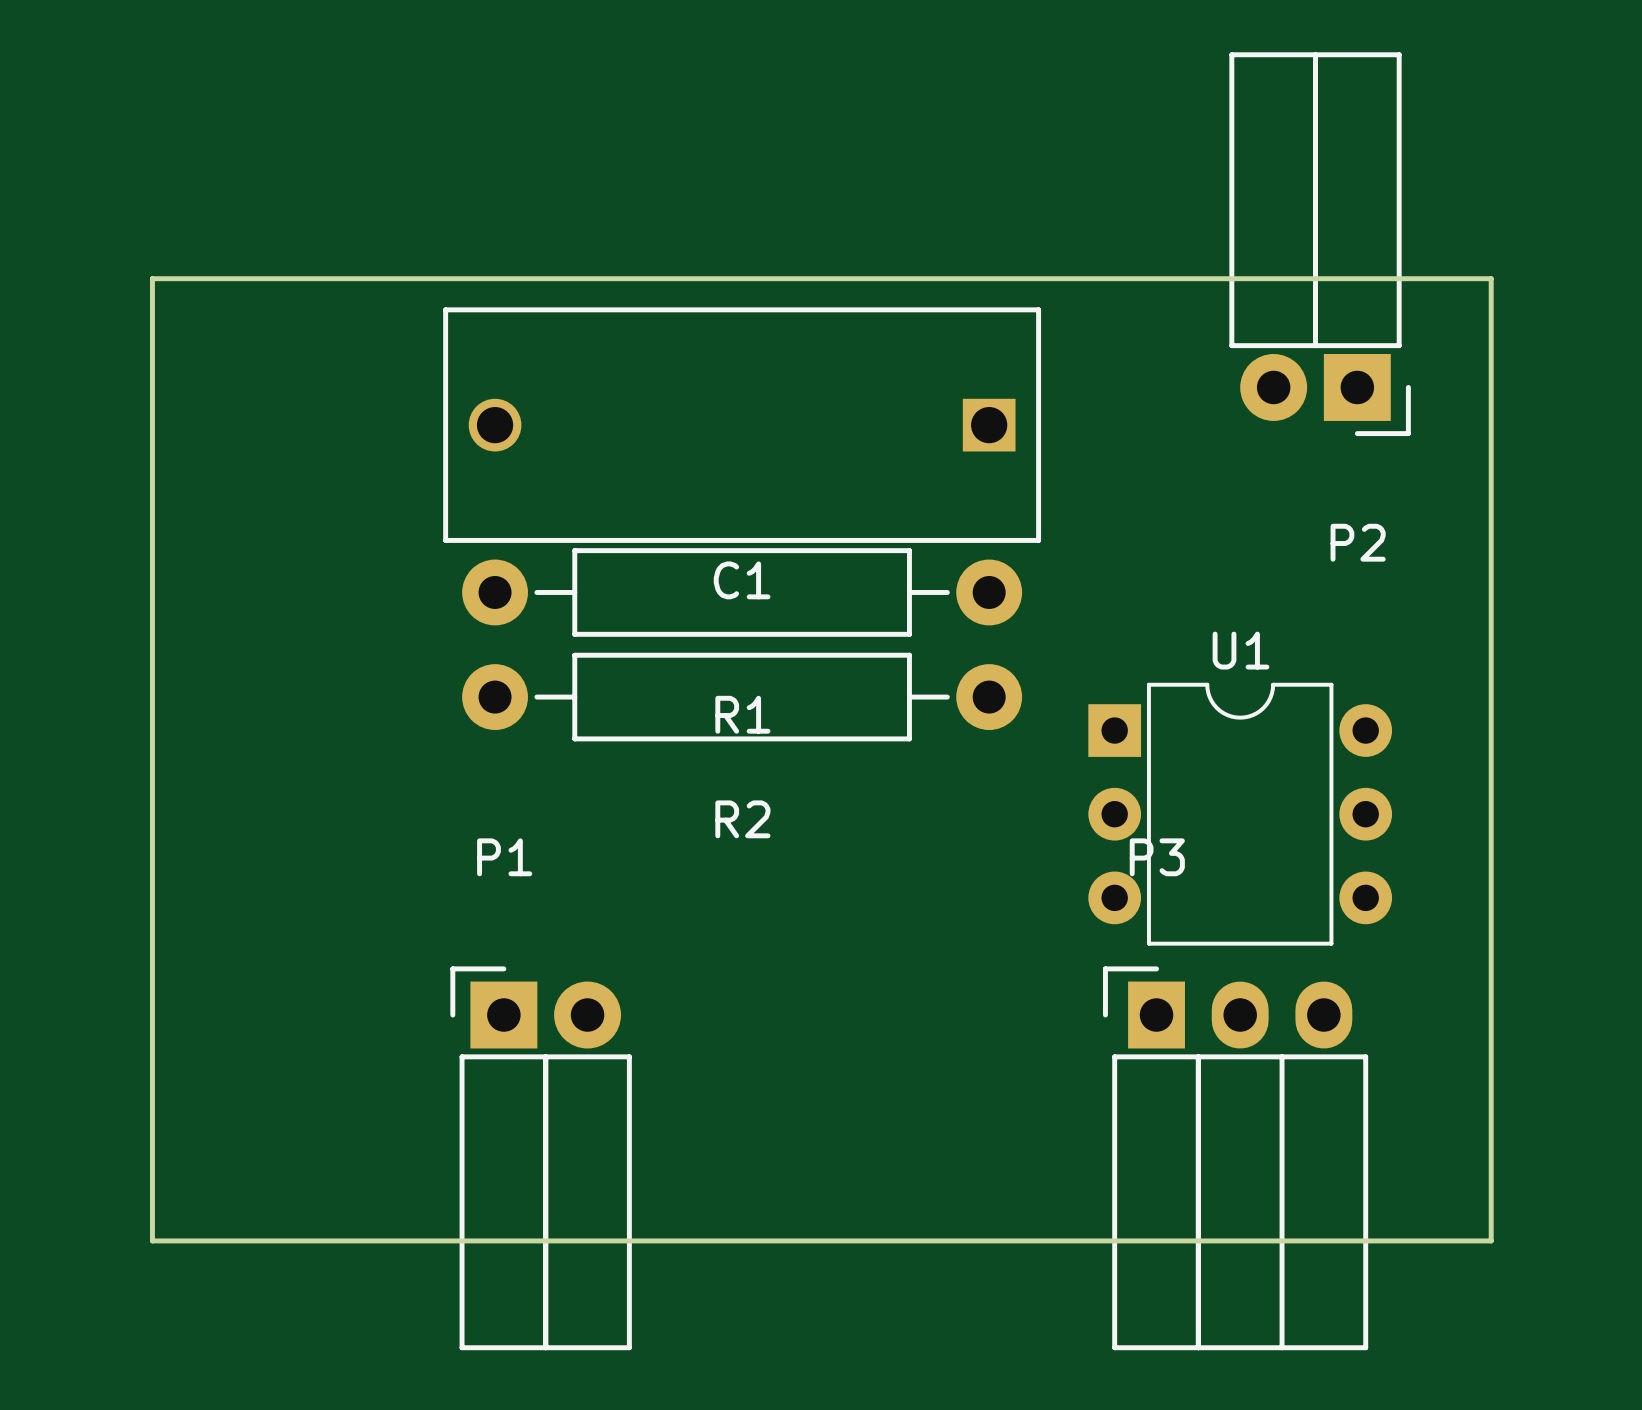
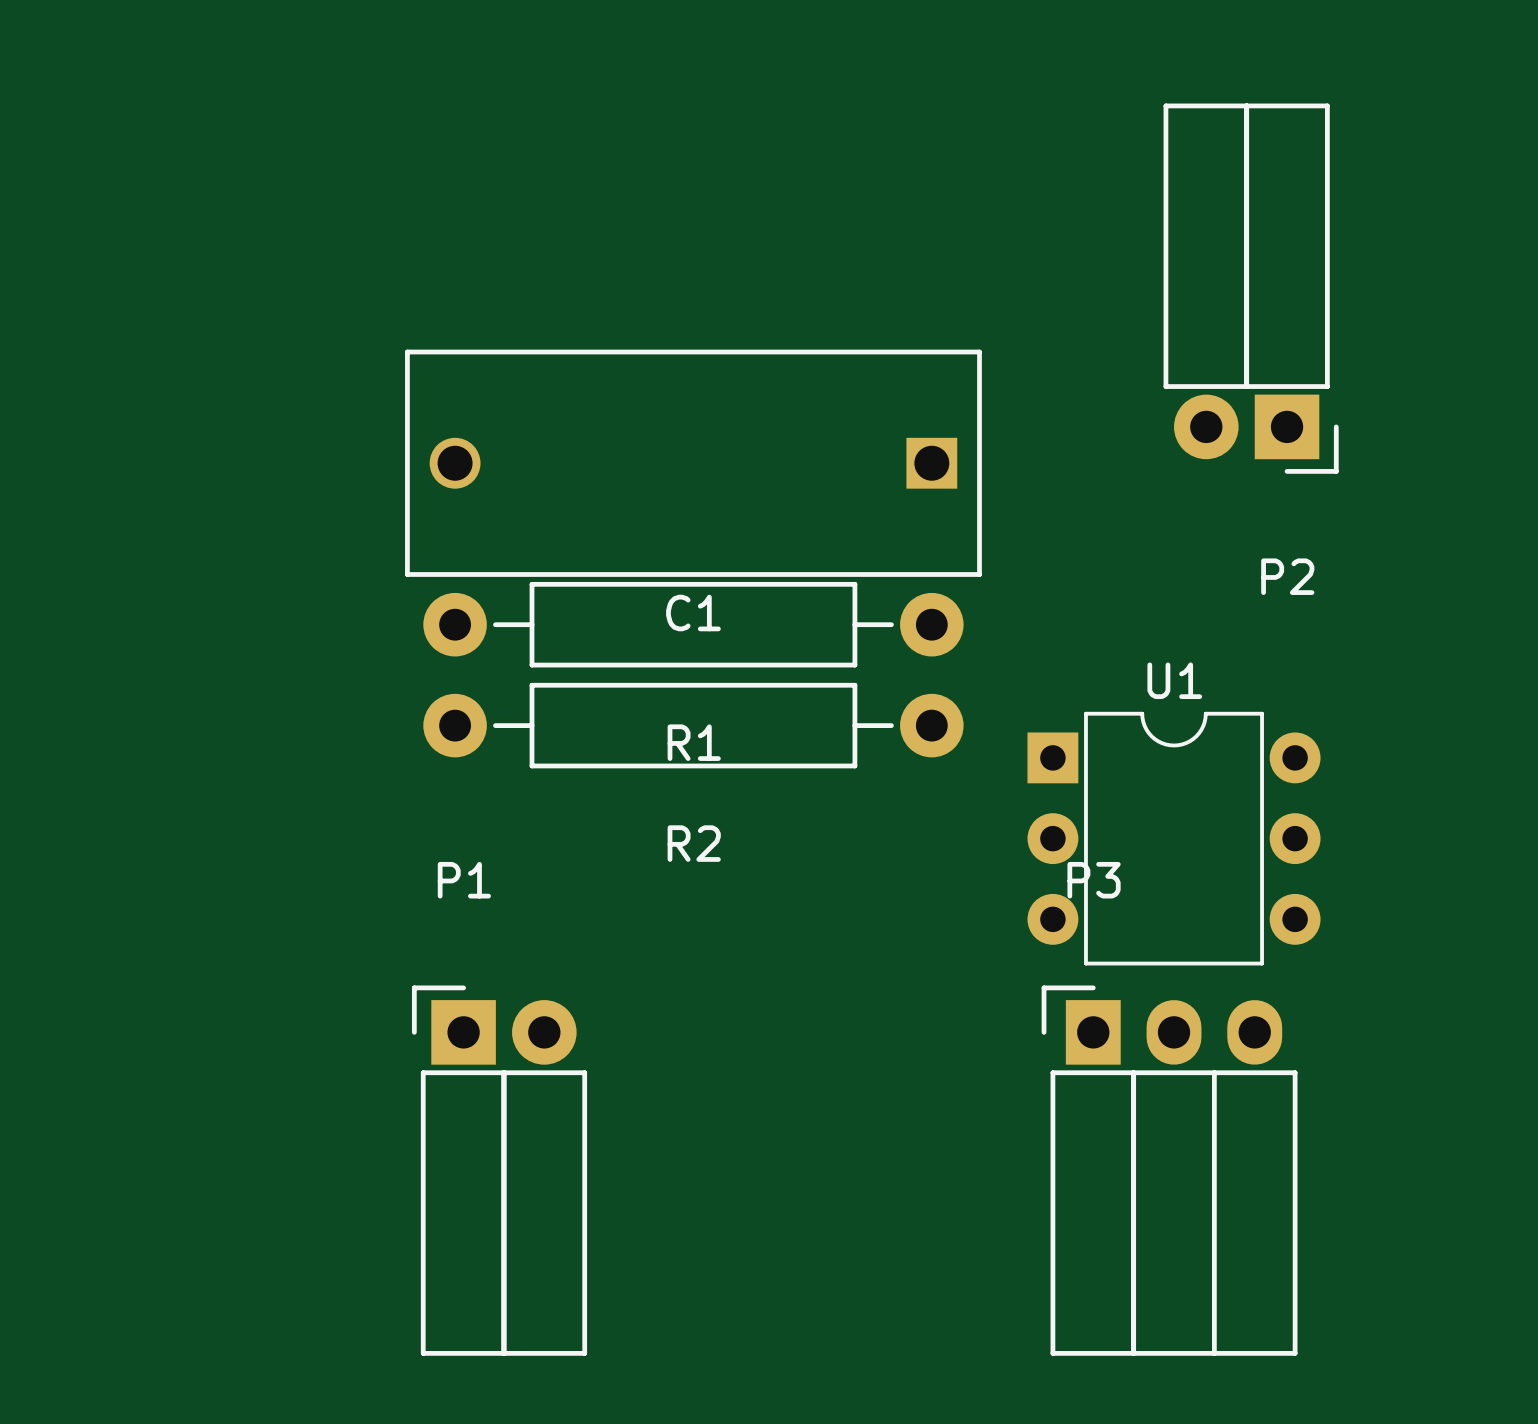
board edge: (152, 278) (152, 1240) (1491, 1240) (1491, 278) (152, 278) -> none

